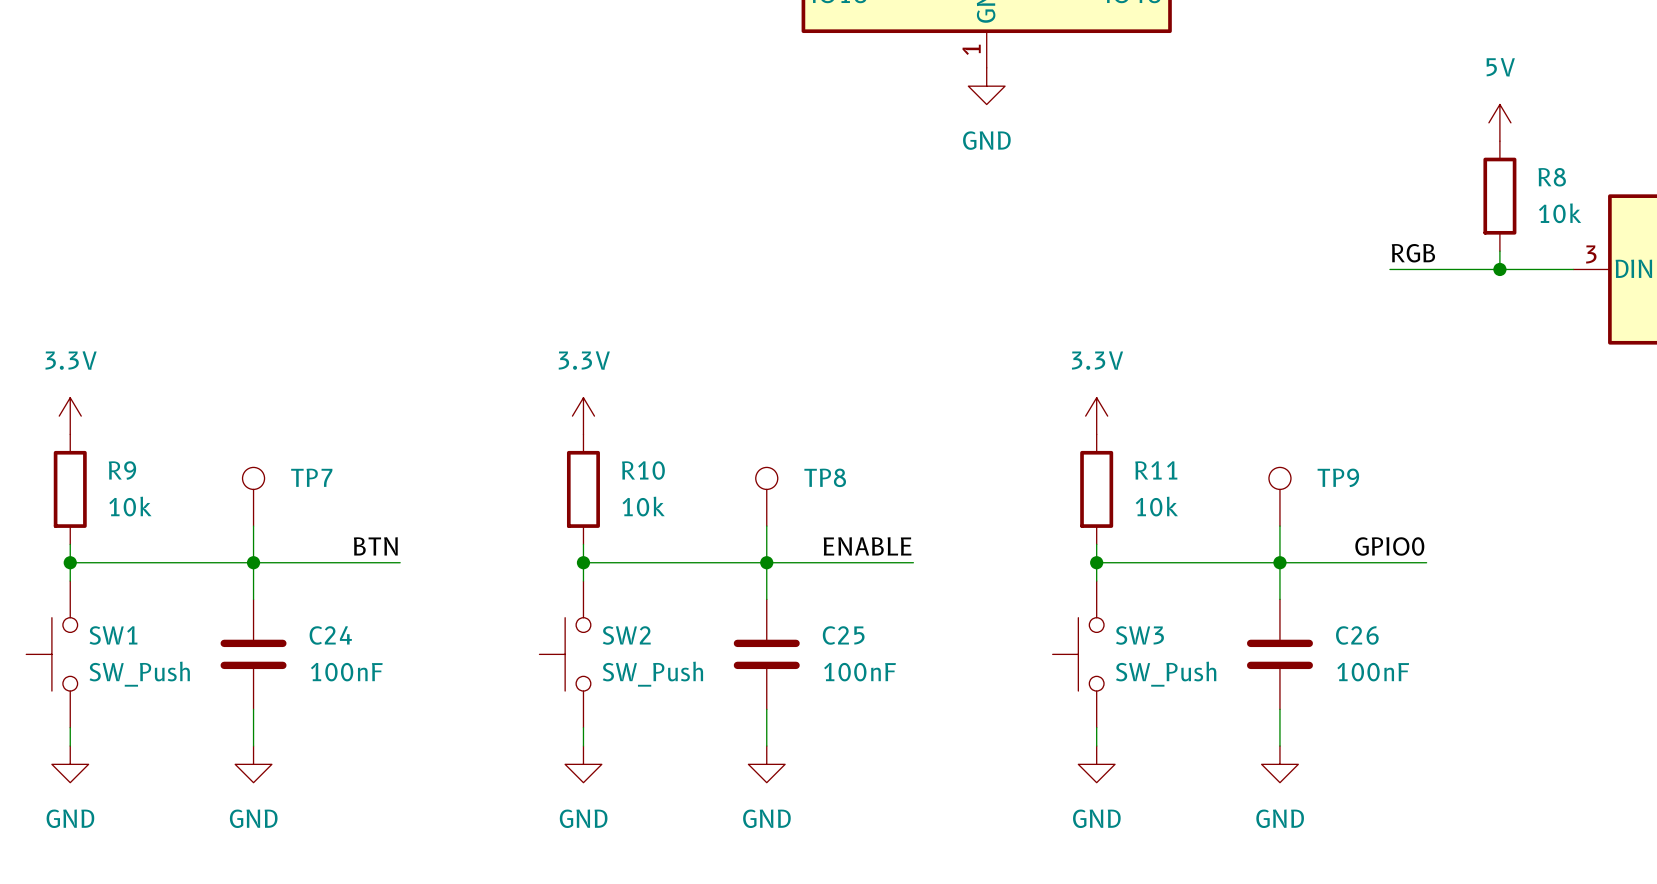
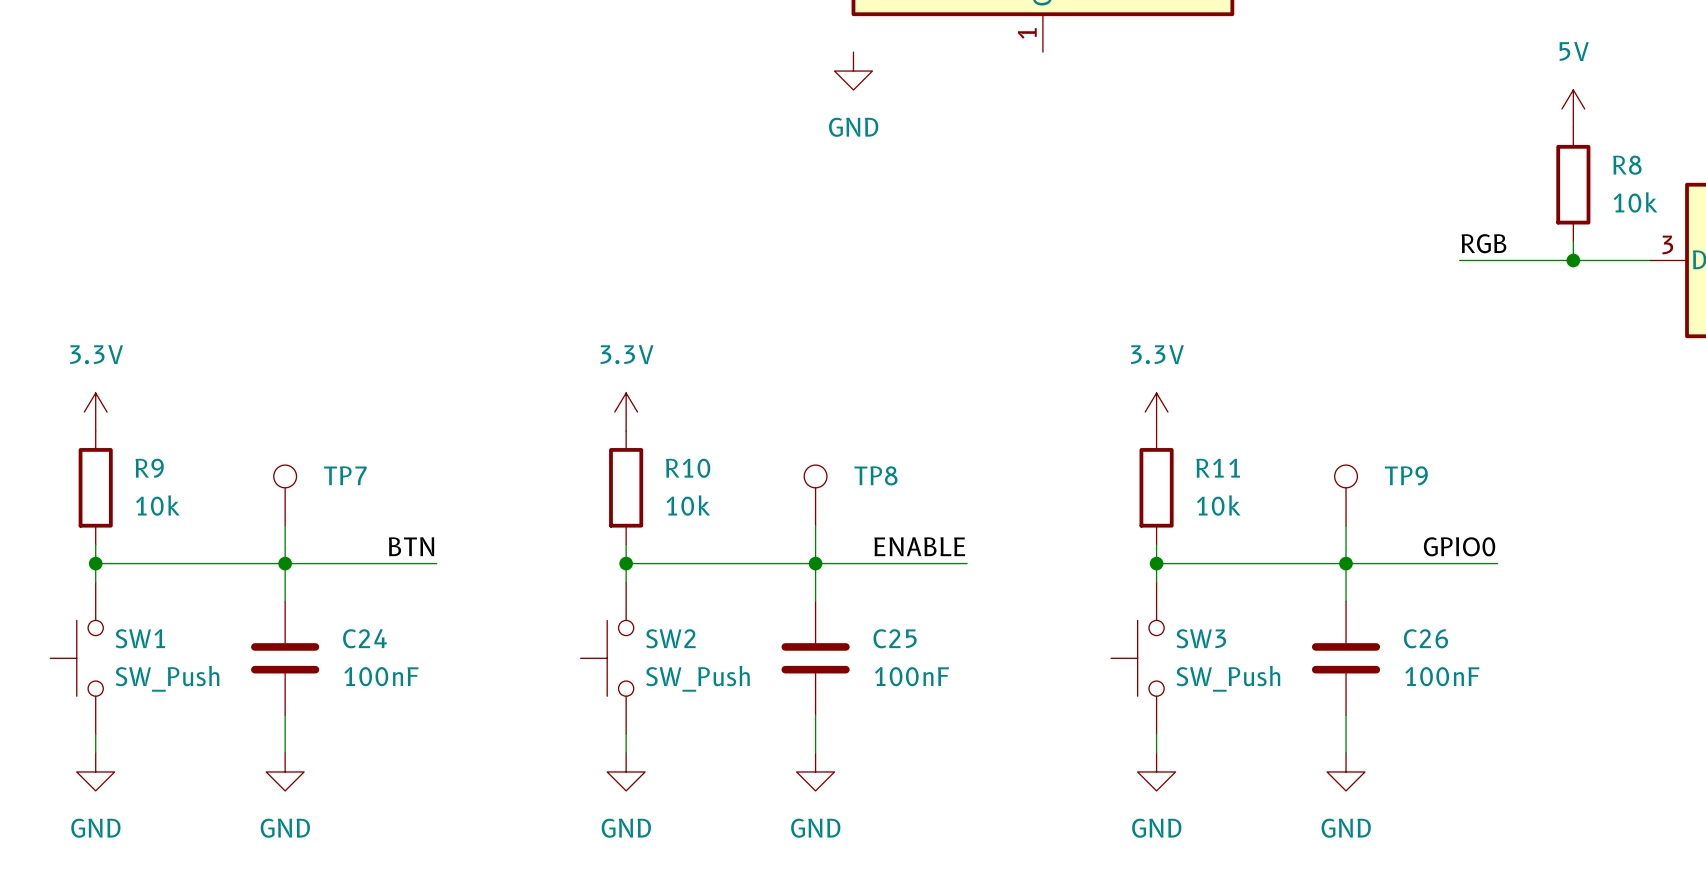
power symbol: none -> GND (853, 71)
power symbol: GND (986, 86) -> none

